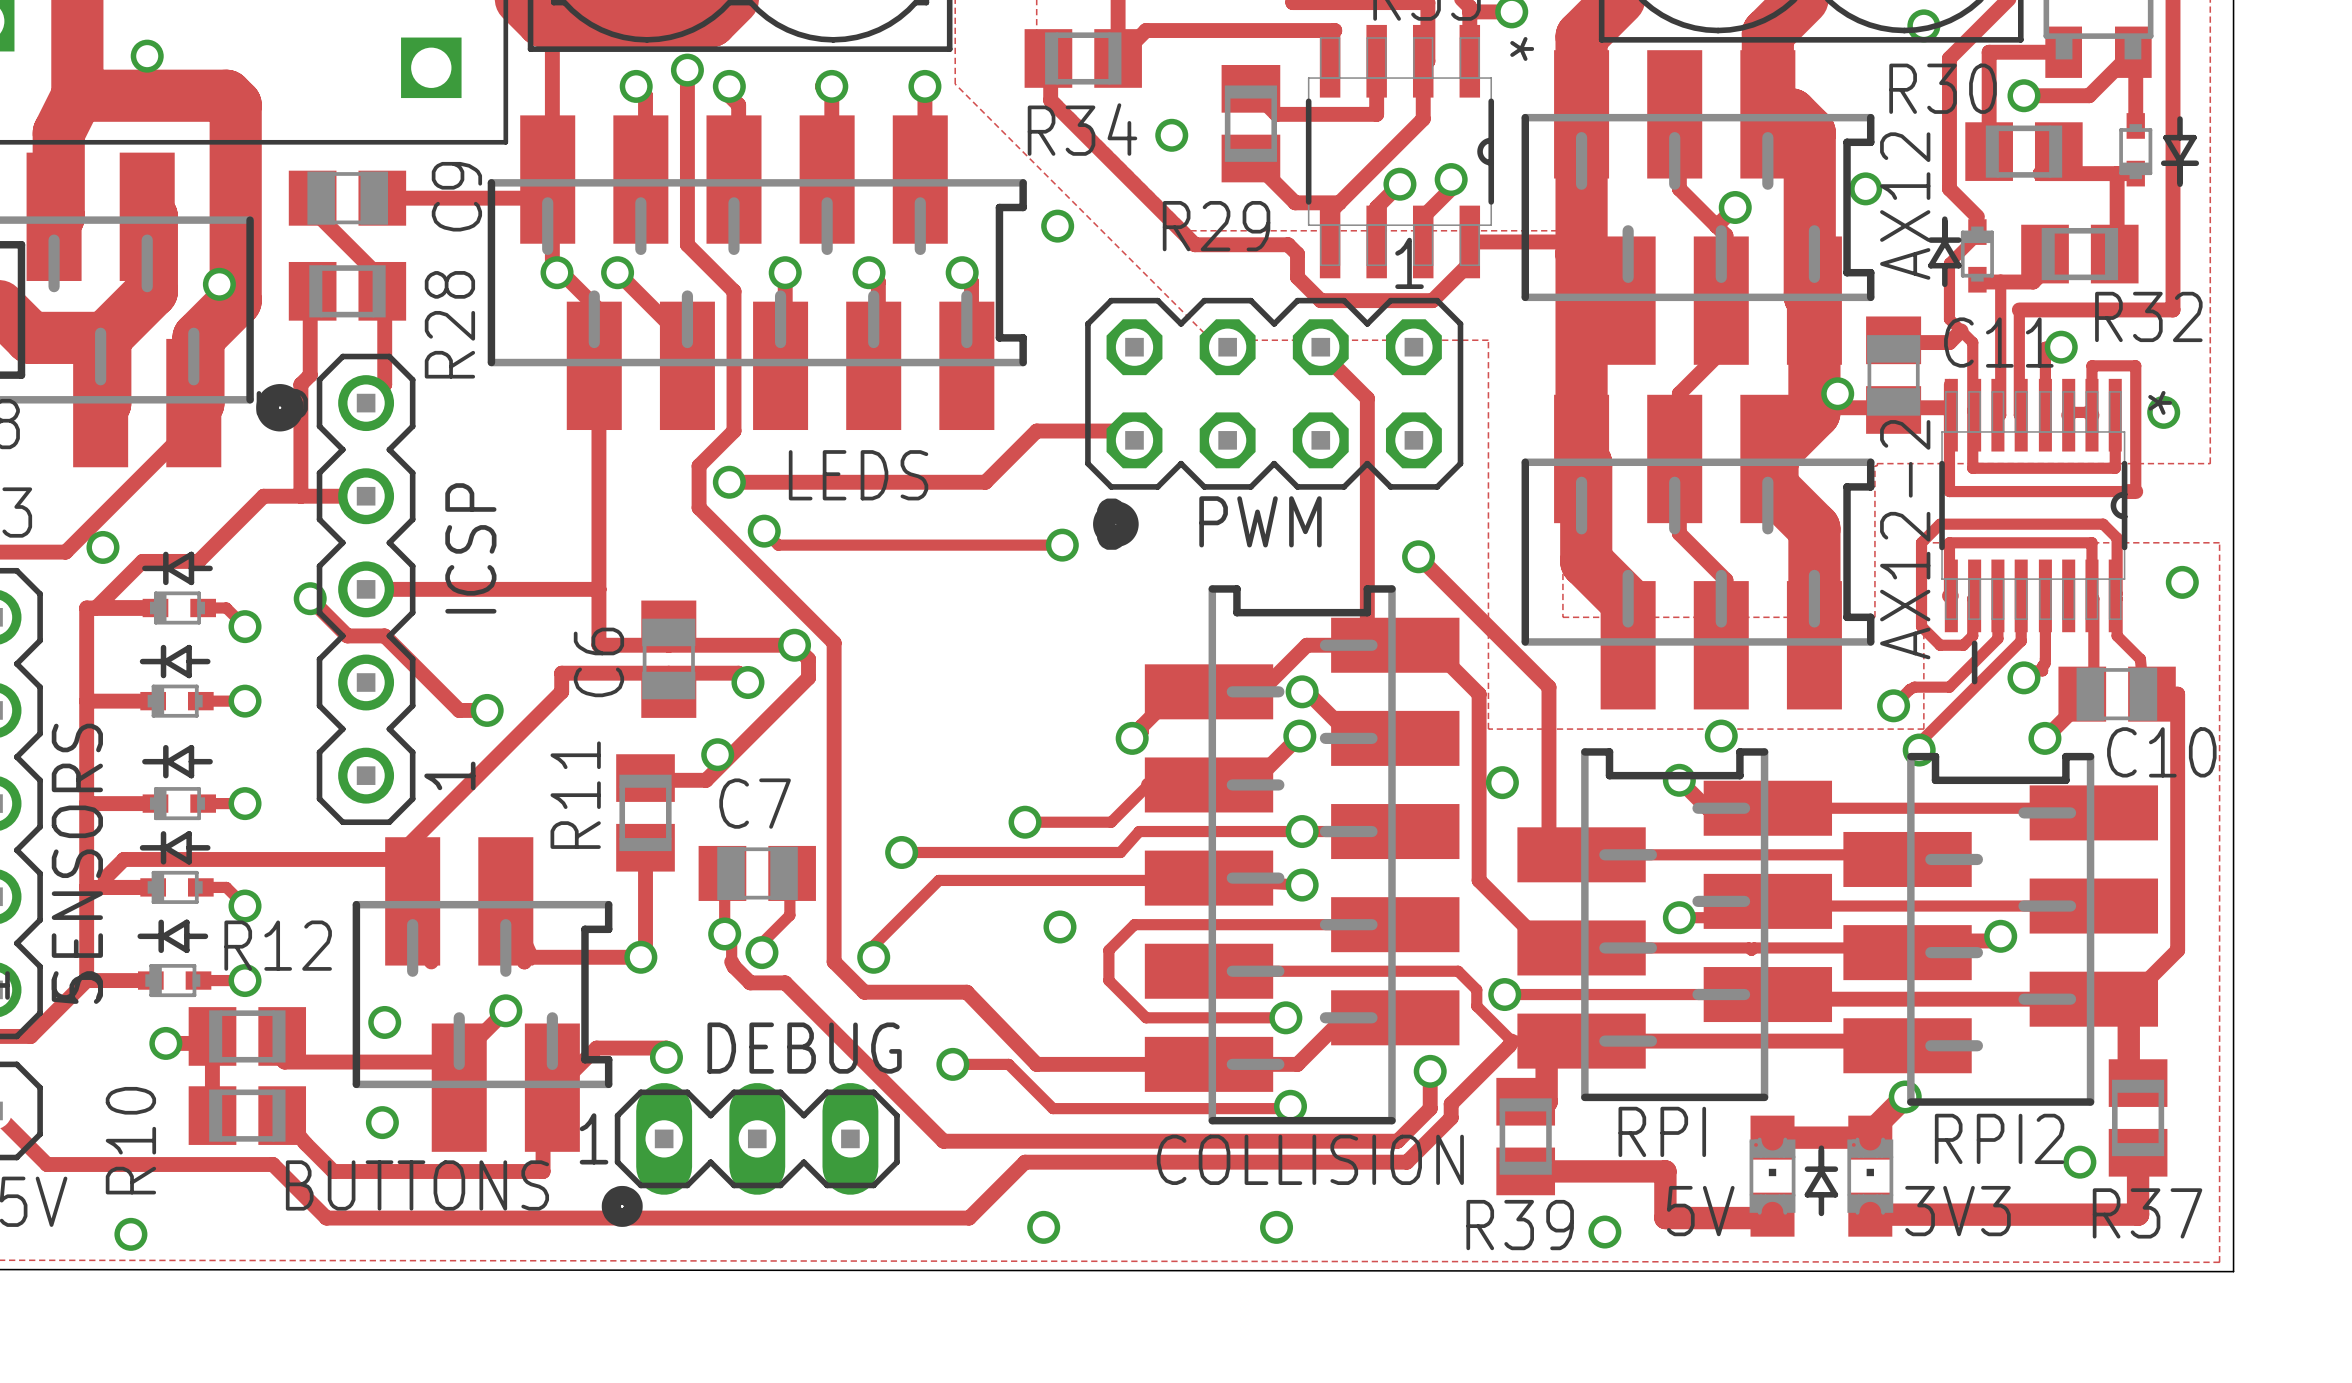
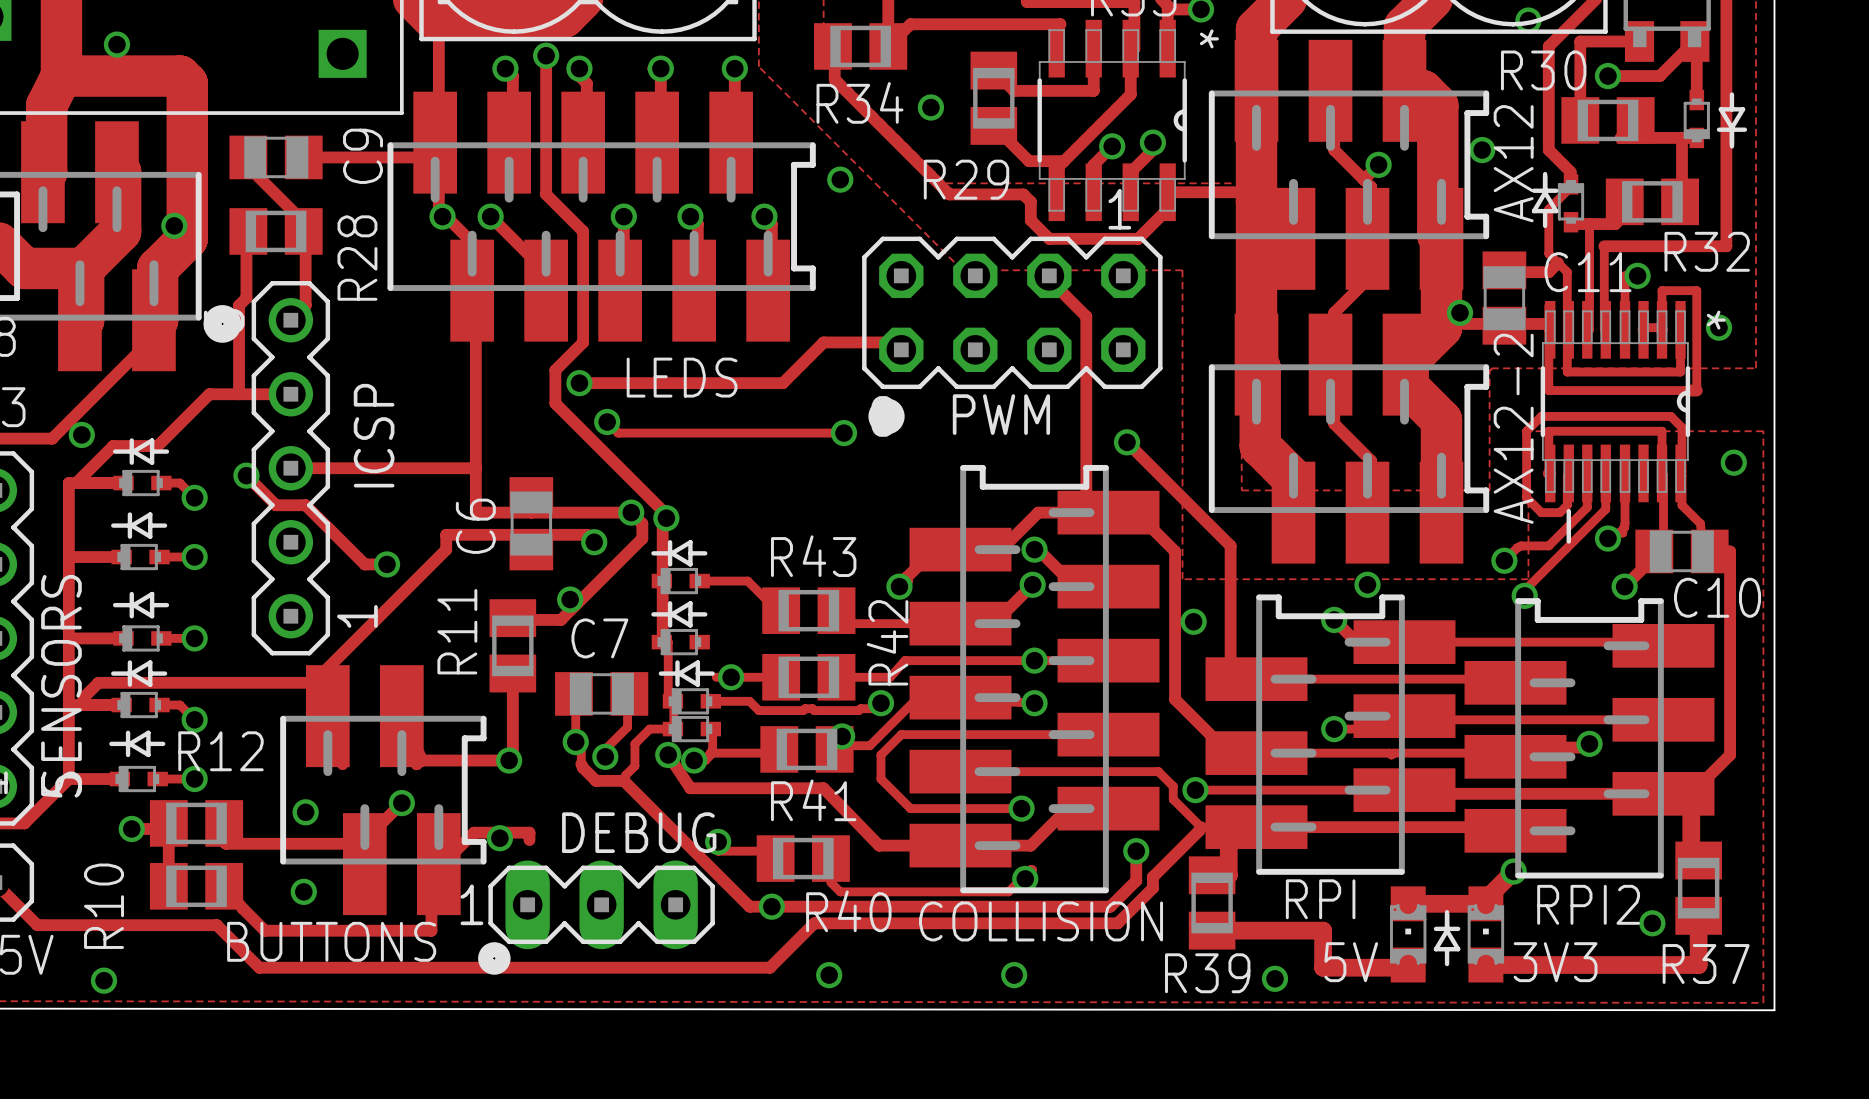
via: none -> (666, 518)
line: none -> (670, 542) (670, 564)
line: none -> (653, 553) (671, 553)
line: none -> (671, 553) (690, 542) (690, 564) (671, 553)
line: none -> (690, 553) (705, 553)
part: none -> (680, 581)
track: none -> (699, 581) (747, 581) (778, 611)
line: none -> (670, 603) (670, 625)
R43: none -> (808, 610)
line: none -> (653, 614) (671, 614)
line: none -> (671, 614) (690, 603) (690, 625) (671, 614)
line: none -> (690, 614) (705, 614)
track: (1148, 784) (1111, 822) (1025, 822) -> (912, 623) (838, 623) (836, 621) (836, 610)
track: (834, 803) (834, 961) (864, 992) (869, 992) -> (662, 638) (661, 642) (668, 642) (668, 701) (671, 703) (673, 699) (673, 727) (672, 729) (649, 729) (634, 743) (634, 766) (625, 775) (623, 780)
part: none -> (680, 642)
via: (1025, 822) -> none
line: none -> (677, 662) (677, 684)
line: none -> (660, 673) (679, 673)
line: none -> (679, 673) (697, 662) (697, 684) (679, 673)
line: none -> (697, 673) (712, 673)
via position: (901, 852) -> (731, 677)
track: (985, 852) (1050, 852) -> none
R42: none -> (808, 677)
track: (1167, 878) (1162, 880) (938, 880) (873, 945) (873, 957) -> (927, 697) (917, 697) (869, 745) (836, 745) (832, 749) (834, 749)
part: none -> (691, 701)
track: none -> (710, 701) (749, 701) (758, 710) (803, 710) (805, 708) (814, 710) (858, 710) (860, 708) (877, 708) (880, 703)
via: none -> (880, 703)
part: none -> (691, 729)
track: none -> (710, 729) (712, 729) (712, 749) (705, 760) (712, 753) (777, 753) (781, 749) (779, 749)
R41: none -> (806, 749)
track: none -> (668, 754) (690, 788)
via: none -> (668, 754)
track: (966, 992) (1036, 1064) (1106, 1064) -> (768, 788) (823, 788) (879, 845)
via position: (666, 1057) -> (499, 838)
track: none -> (718, 841) (718, 851) (773, 851) (775, 858)
via: none -> (718, 841)
track: (952, 1064) (1008, 1064) (1053, 1108) (1288, 1108) (1290, 1106) -> none
via: (952, 1064) -> none
R40: none -> (803, 858)
track: none -> (831, 858) (831, 882) (840, 891) (1008, 891) (1032, 869)
via: none -> (771, 906)

